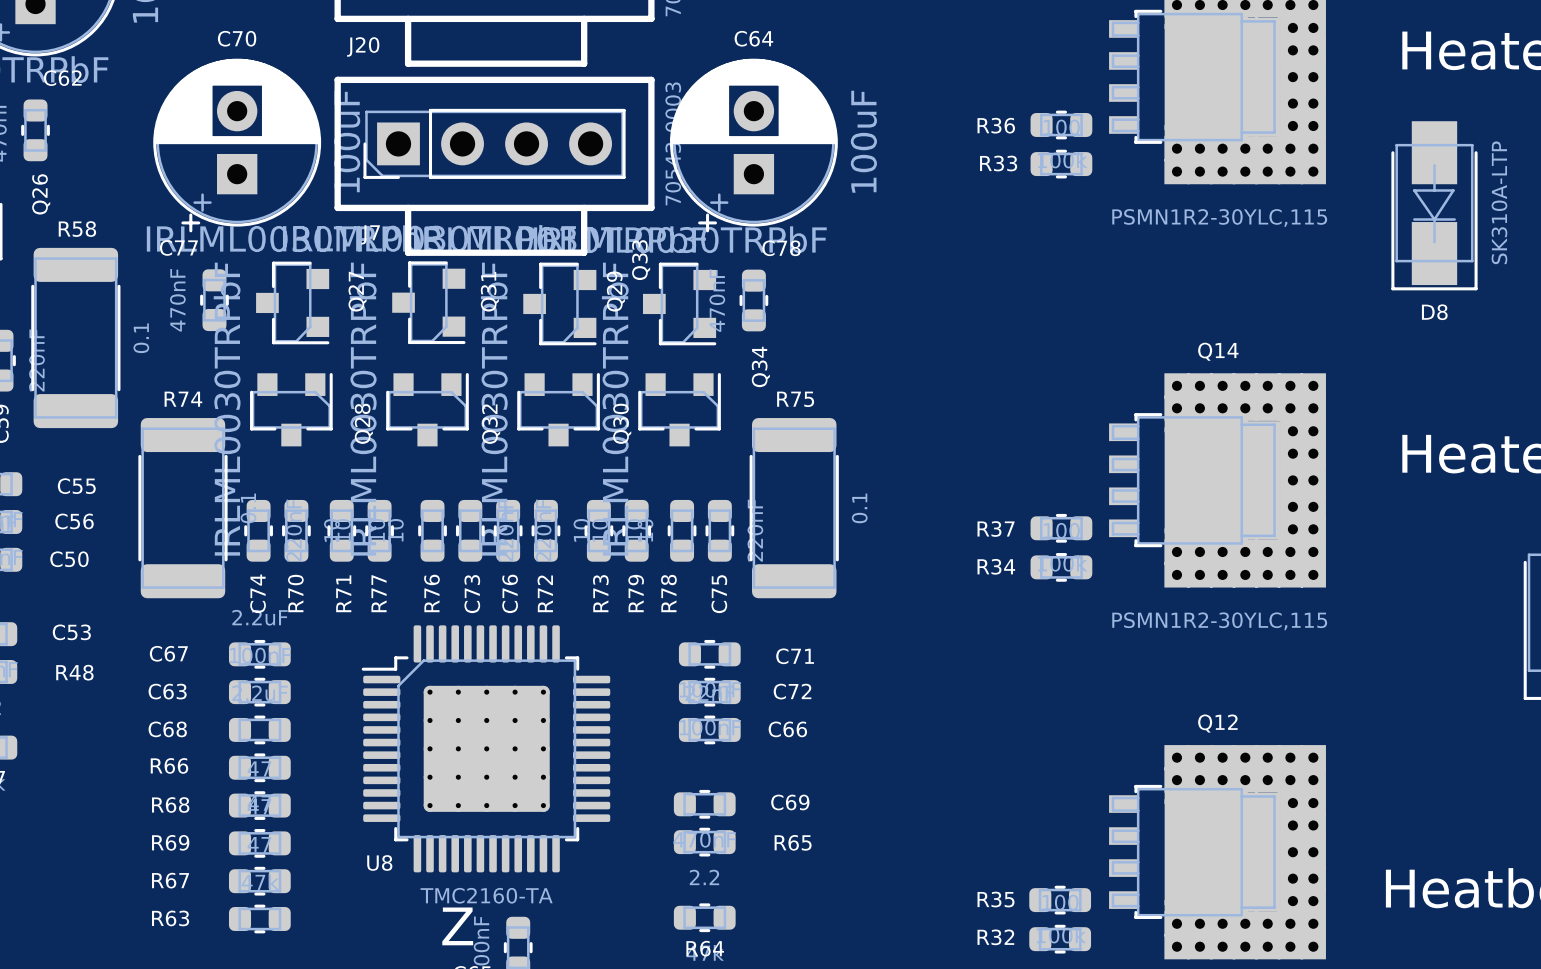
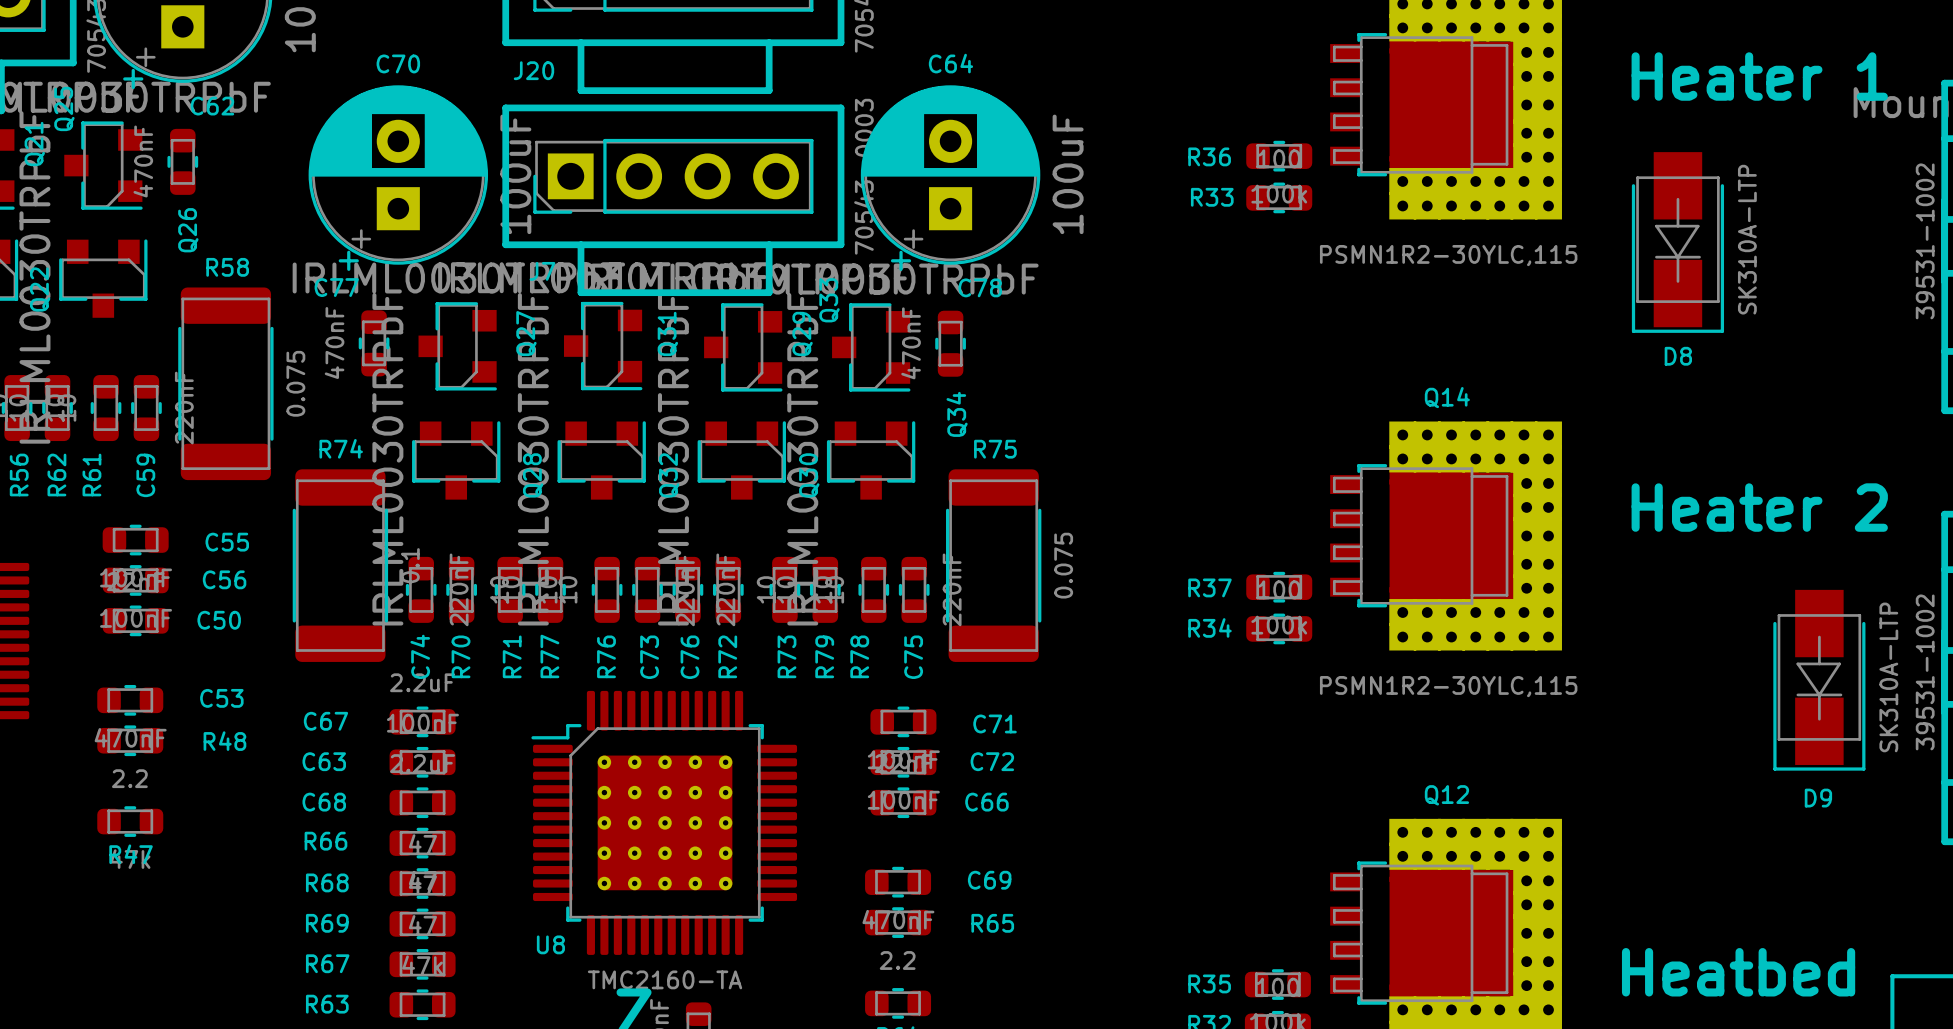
R58 value: 0.1 (141, 338) -> 0.075 (295, 383)
R75 value: 0.1 (859, 508) -> 0.075 (1063, 565)

